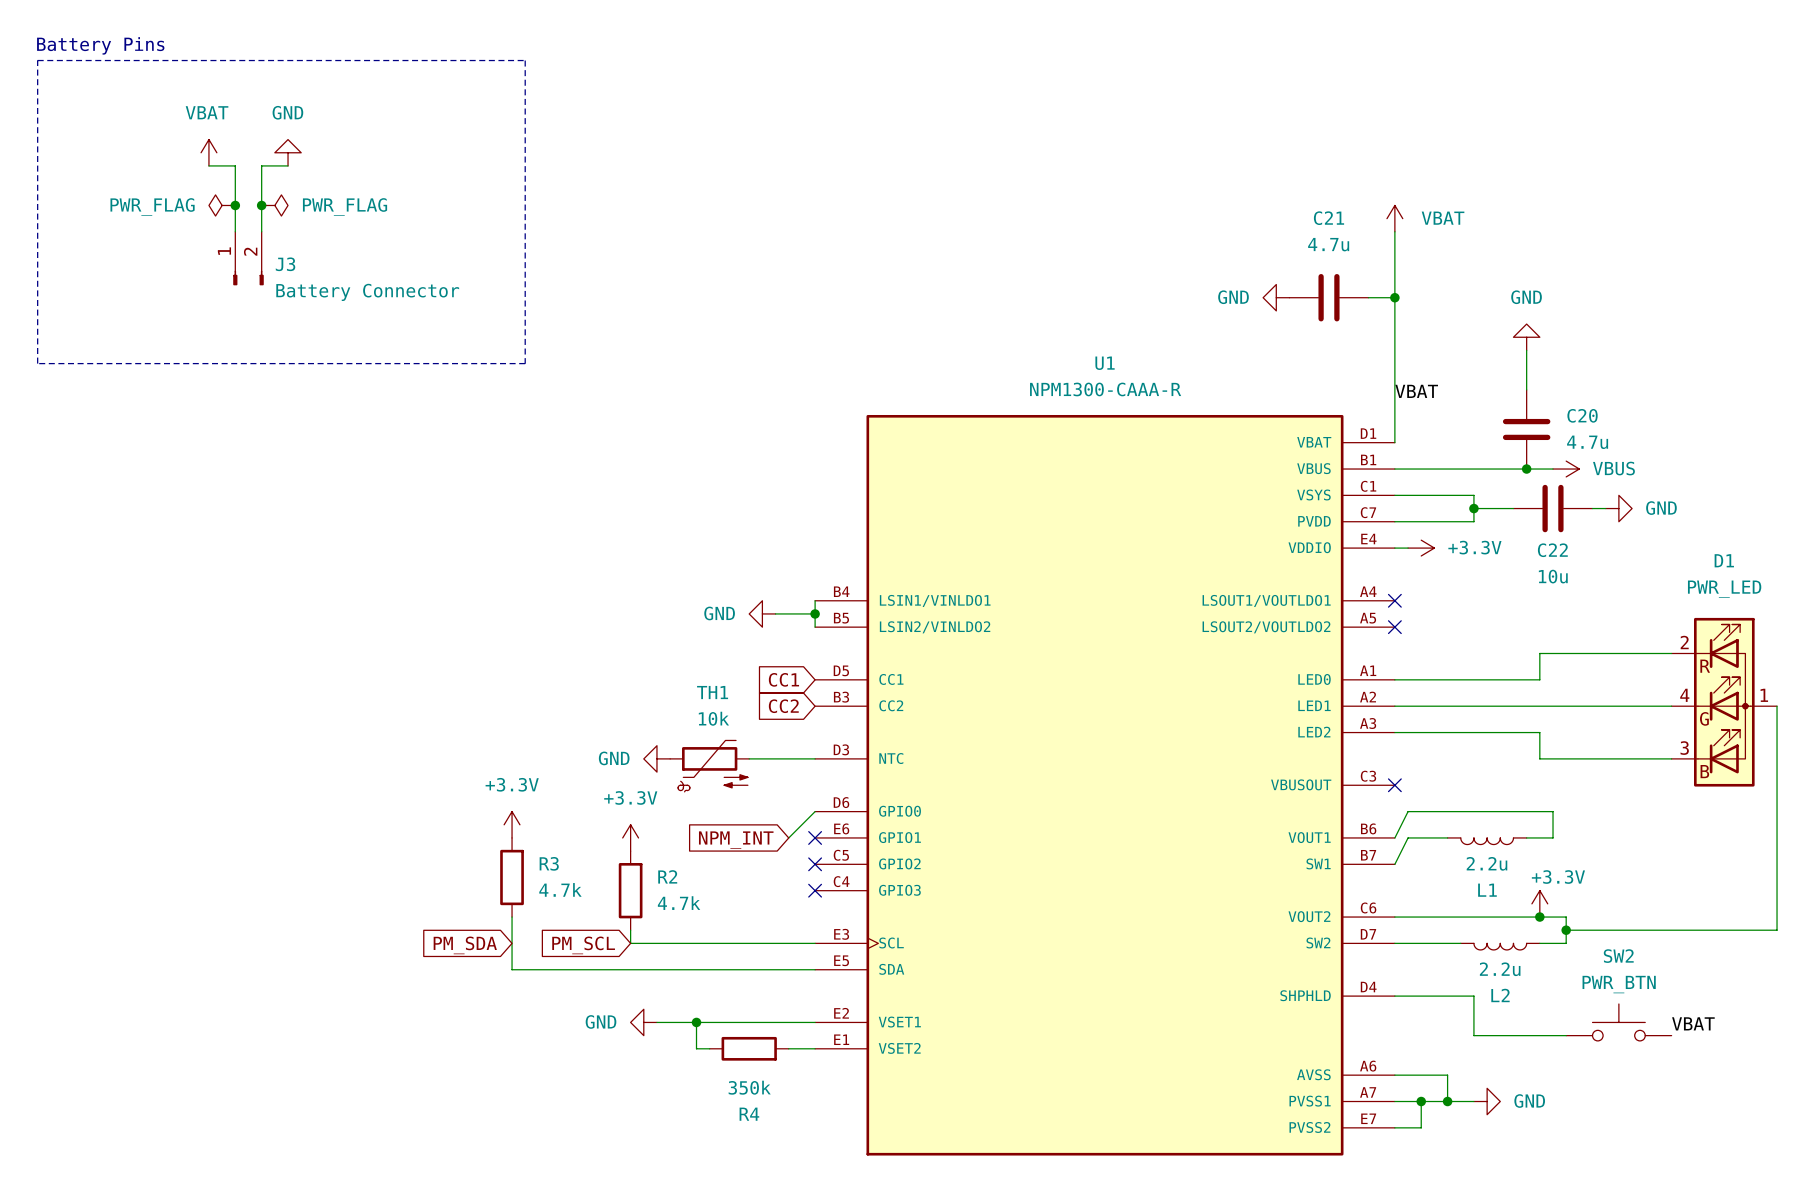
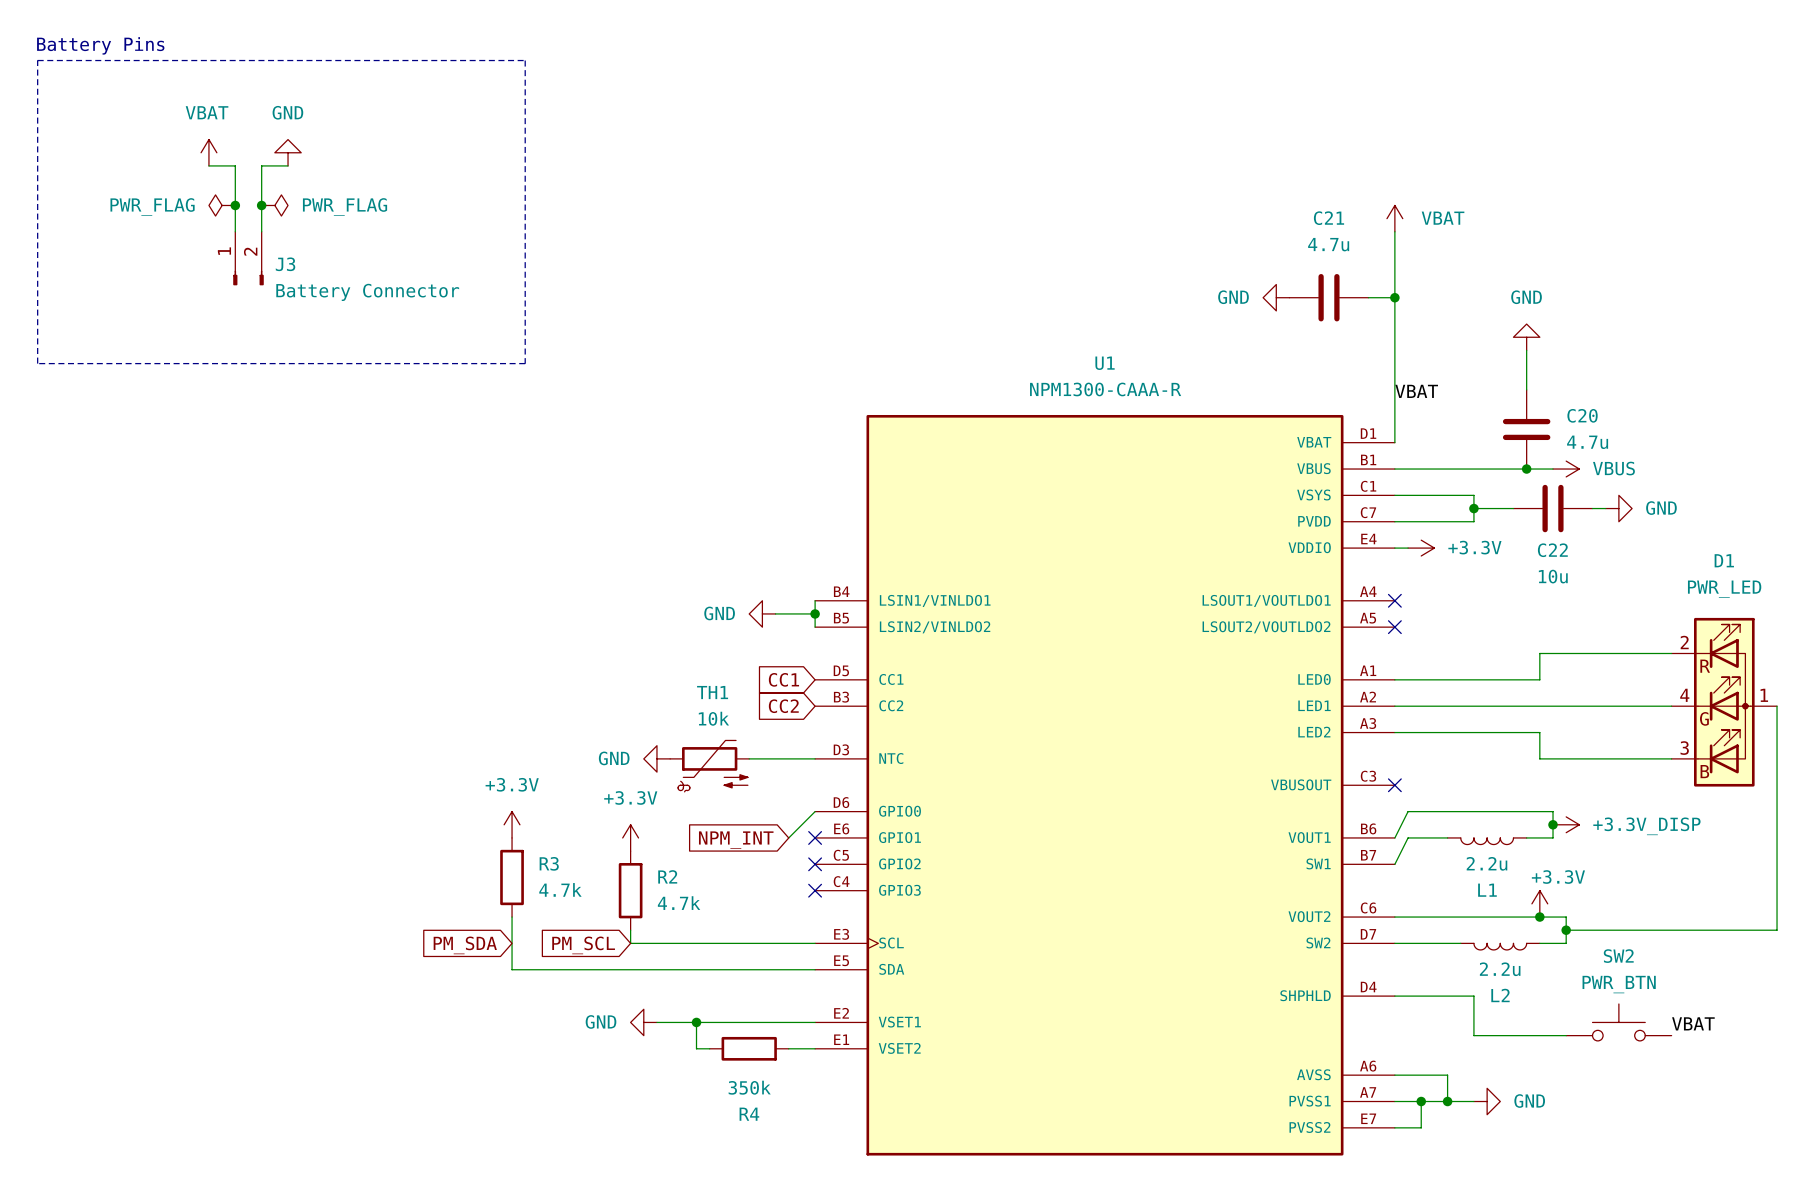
junction: none -> (1553, 824)
power symbol: none -> +3.3V_DISP (1566, 824)

